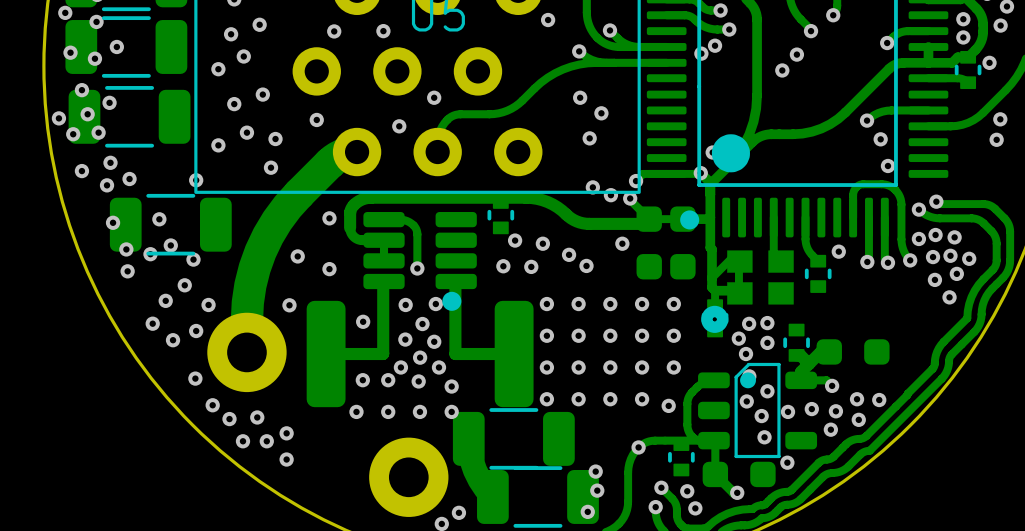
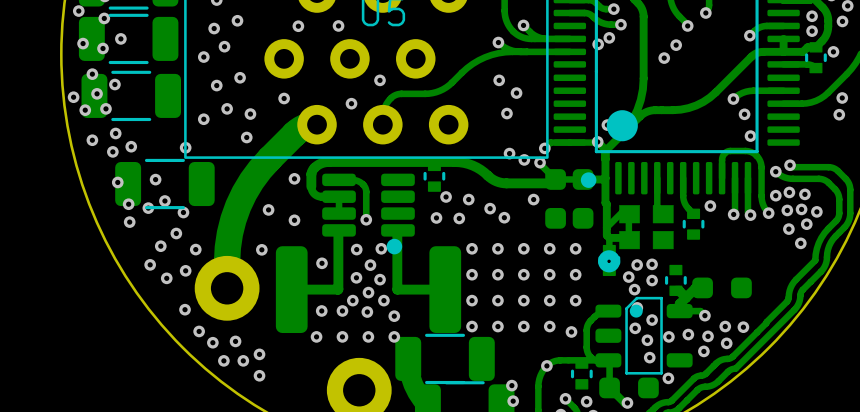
via: (548, 20) -> none

